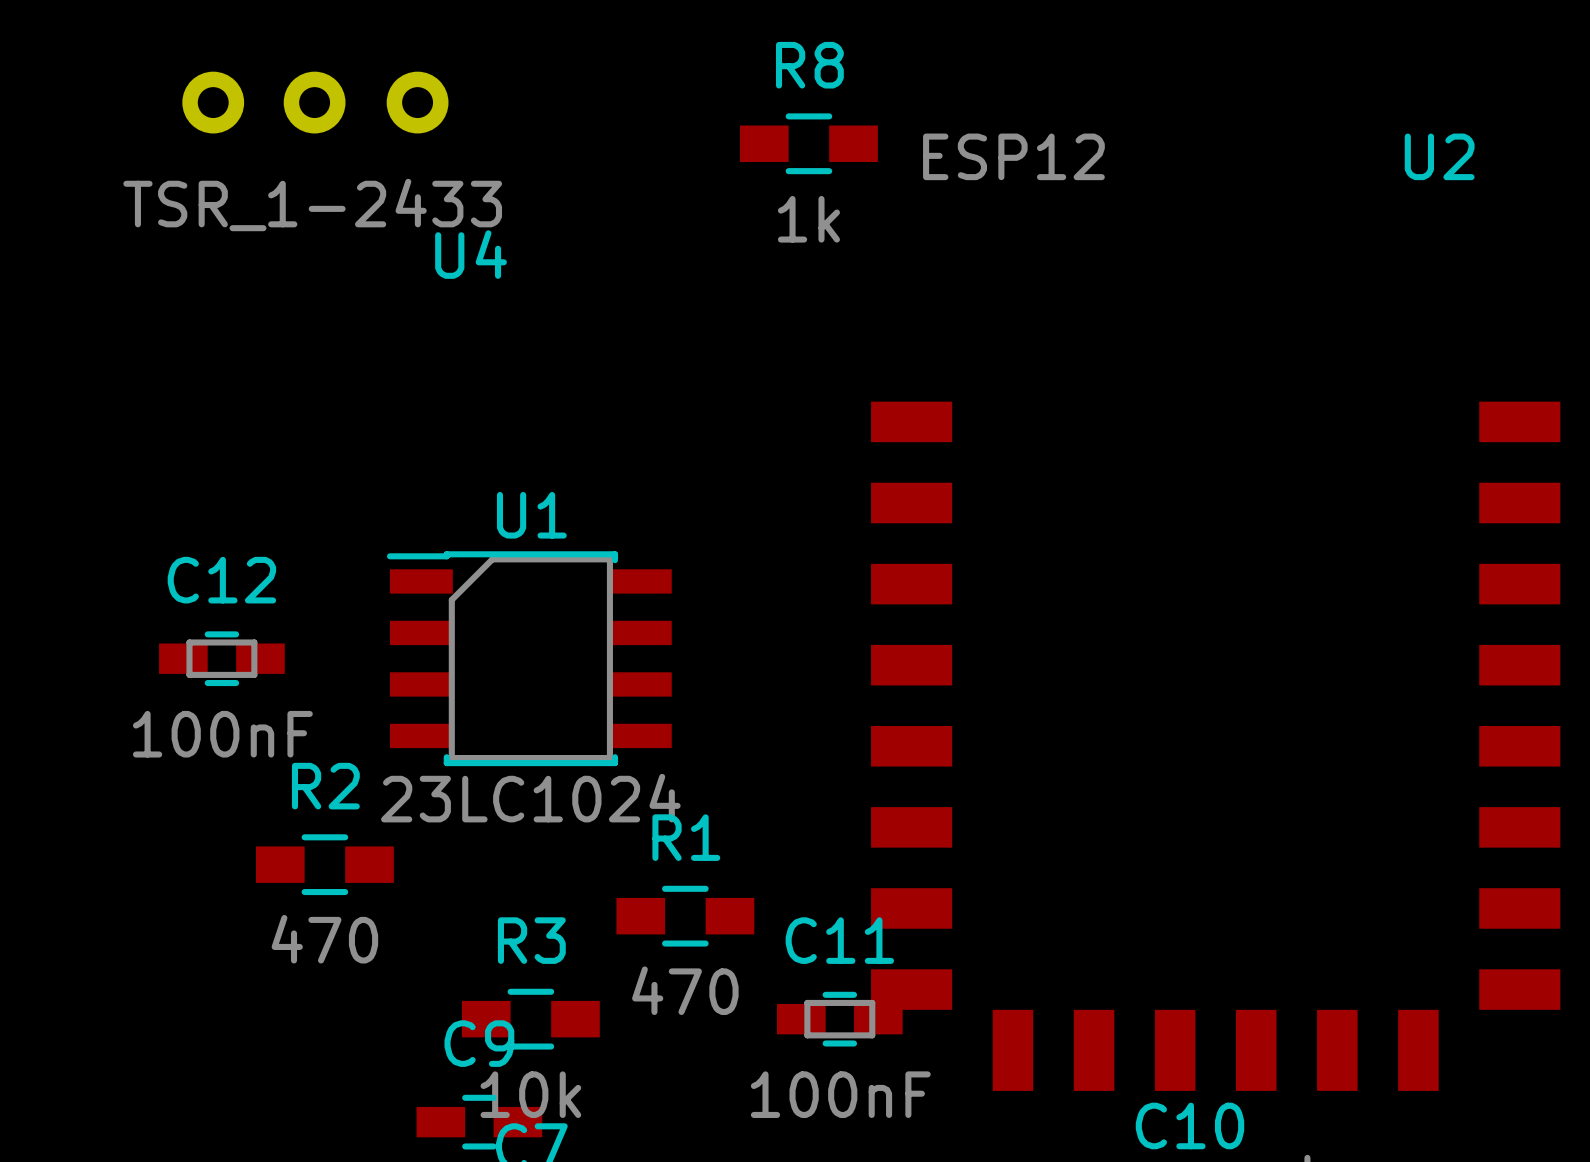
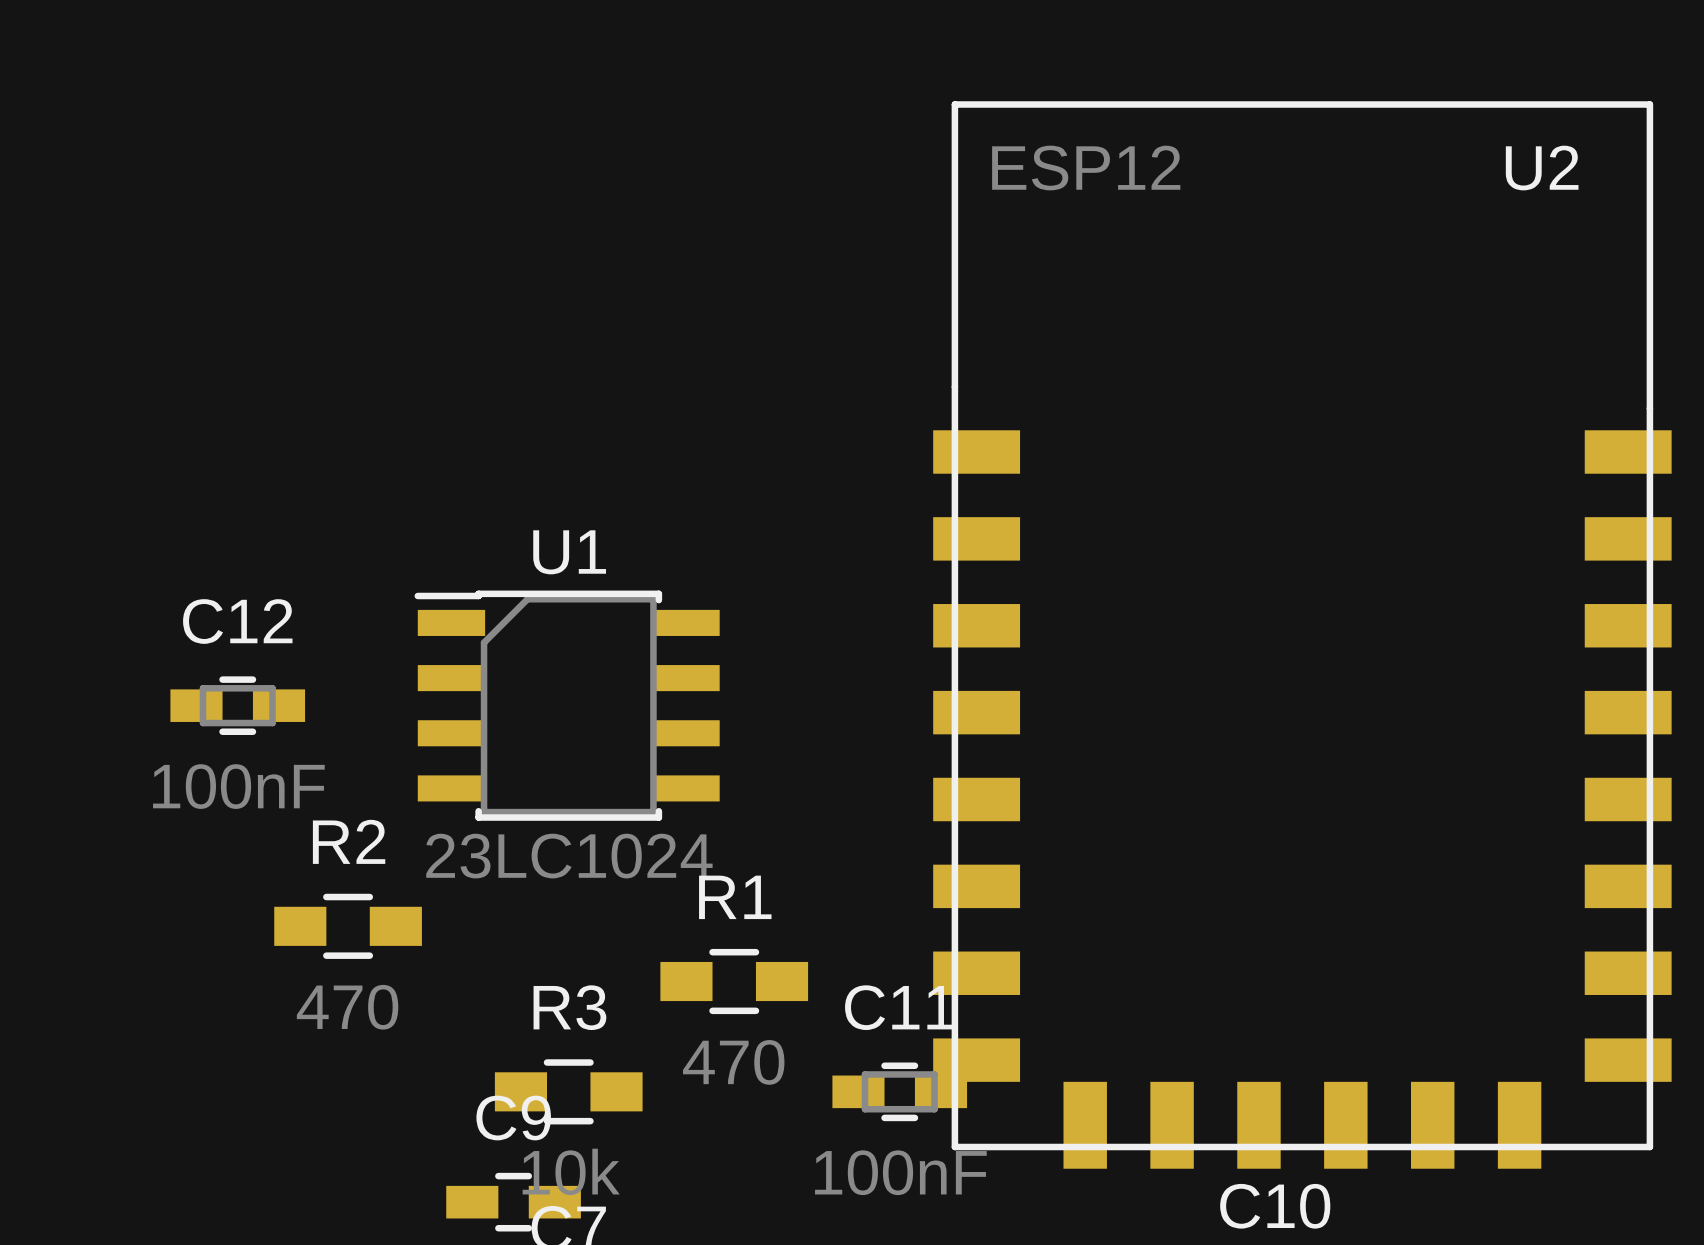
U4: TSR_1-2433 (315, 102) -> none
R8: 1k (808, 143) -> none
U2 footprint: [871, 401, 1561, 1091] -> [933, 101, 1672, 1169]

